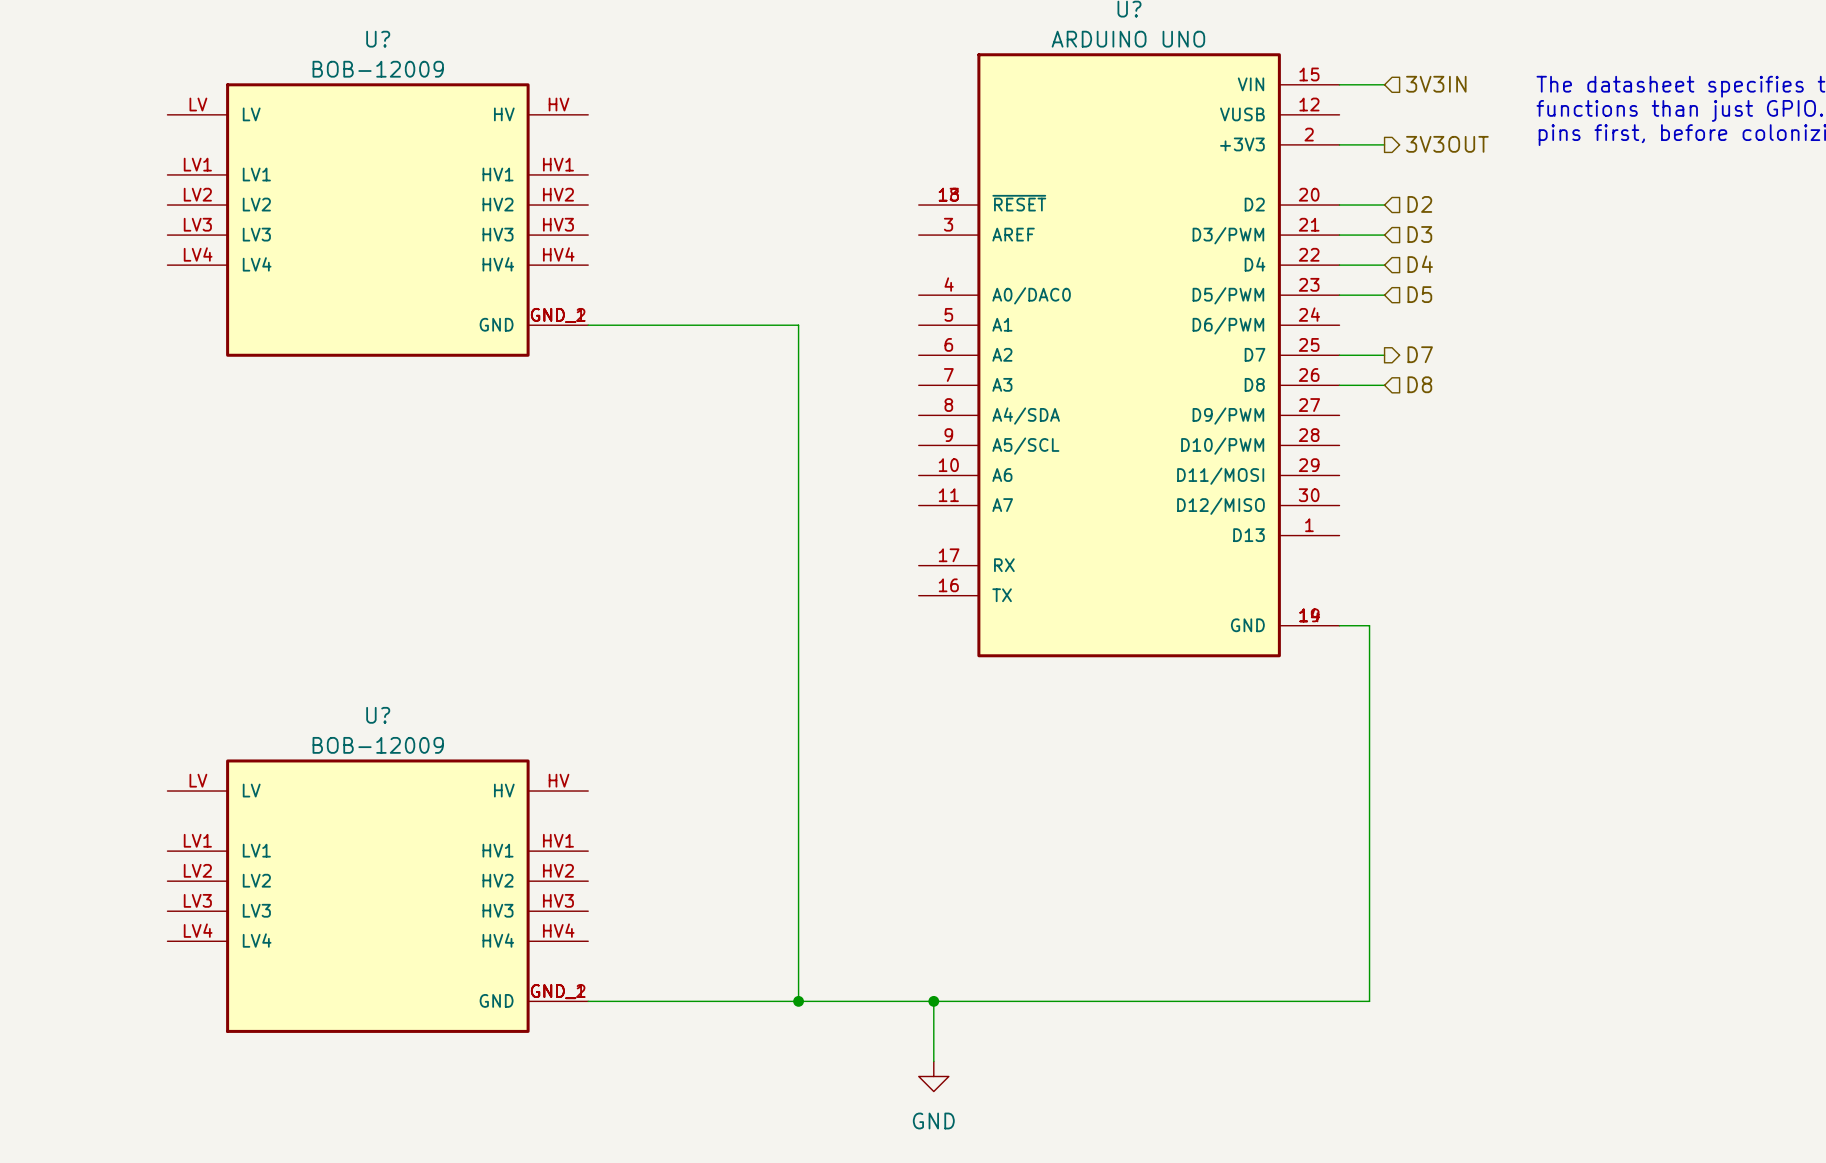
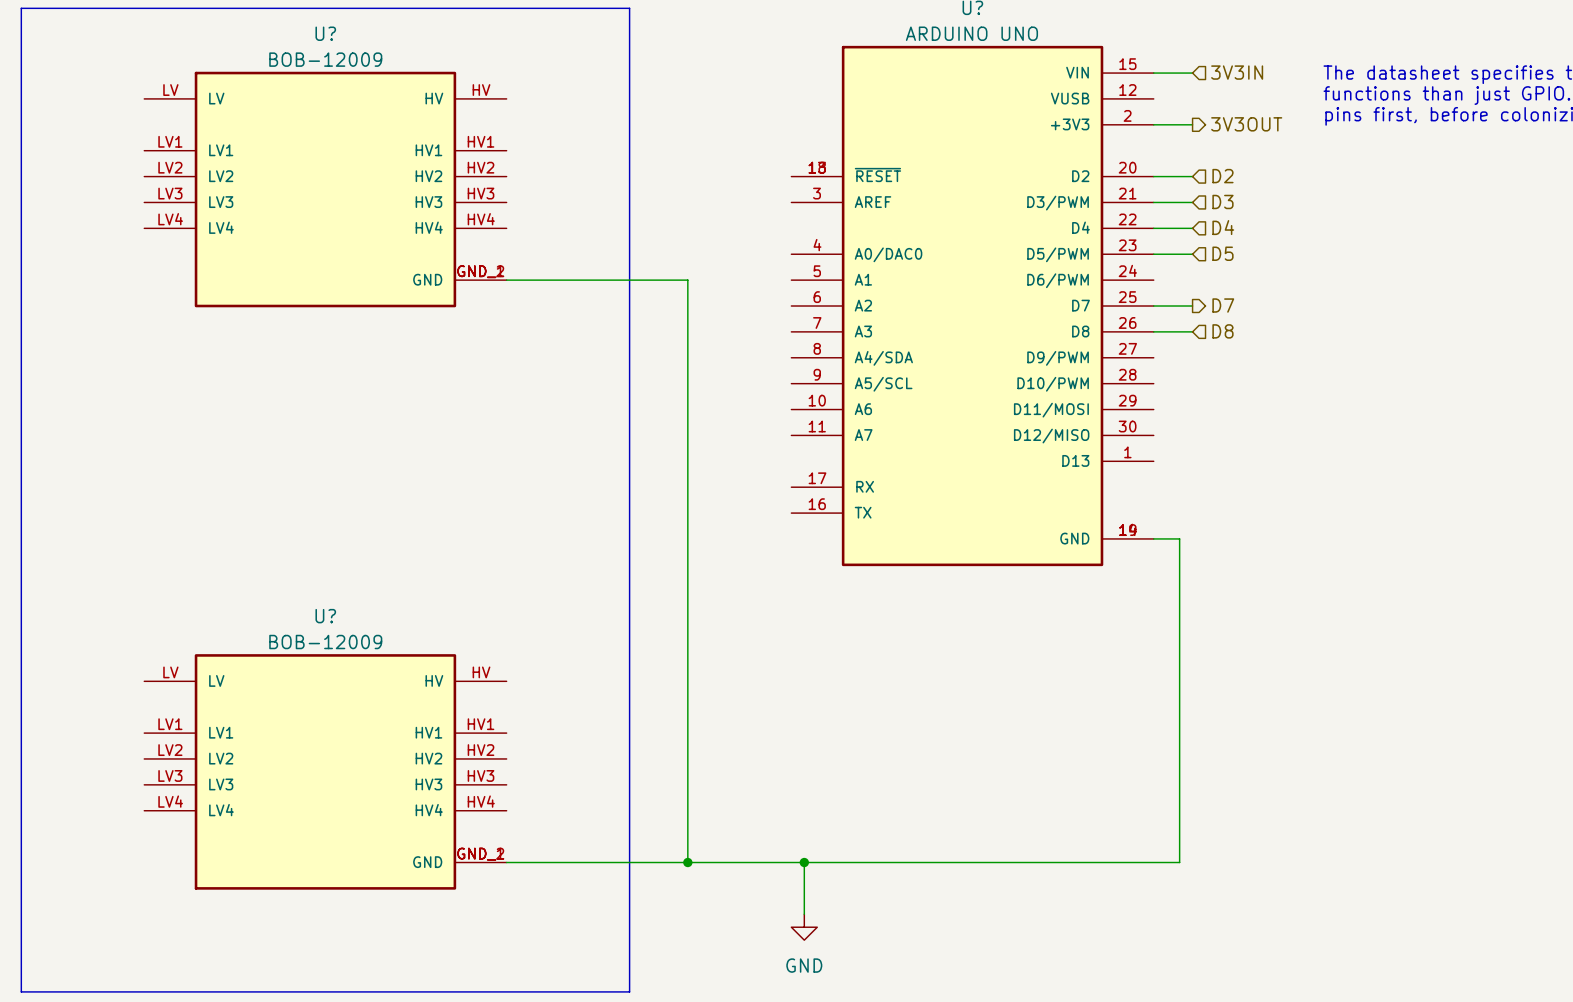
line: none -> (21, 8) (629, 8) (629, 991) (21, 991) (21, 8)

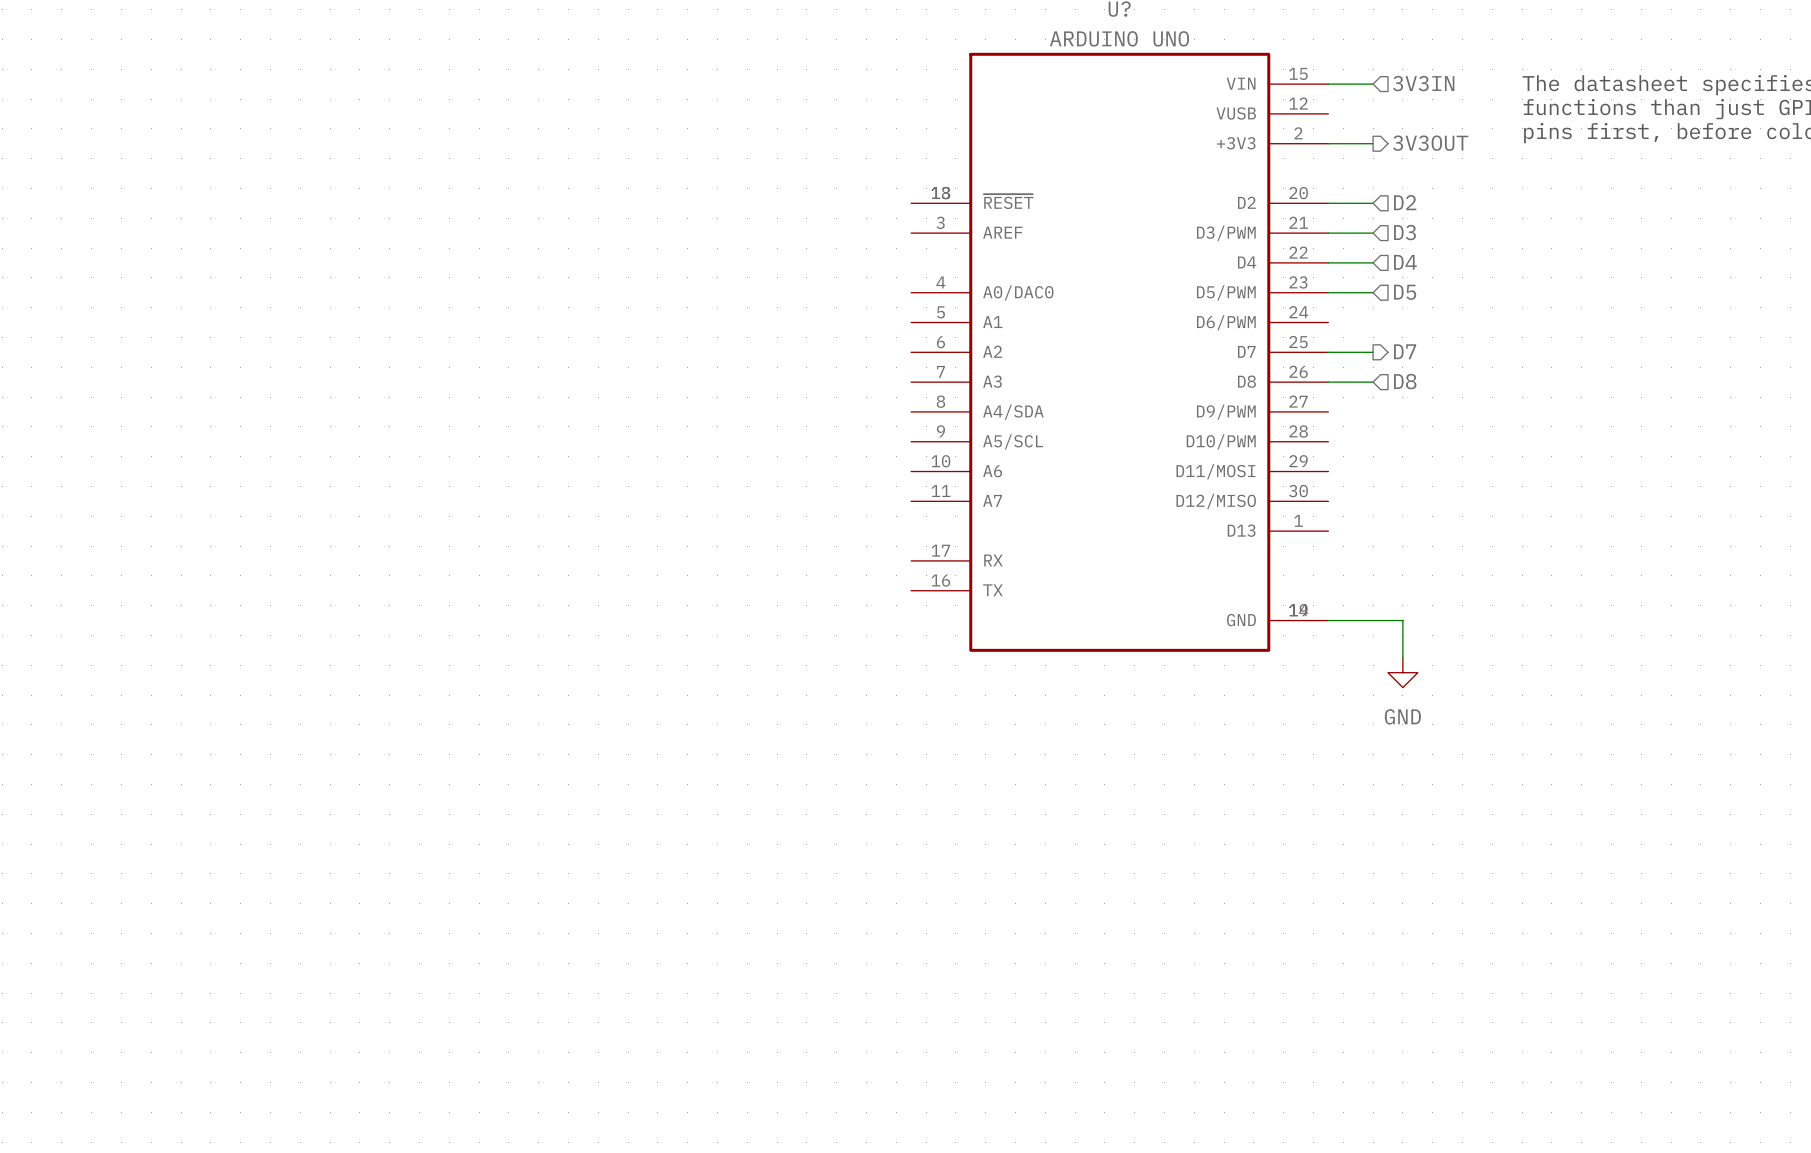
line: (21, 8) (629, 8) (629, 991) (21, 991) (21, 8) -> none
U?: BOB-12009 (325, 189) -> none
wire: (506, 280) (687, 280) (687, 862) -> none
wire: (1179, 538) (1179, 862) (506, 862) -> (1358, 620) (1402, 620) (1402, 657)
power symbol: none -> GND (1402, 672)
U?: BOB-12009 (325, 771) -> none
junction: (687, 862) -> none
wire: (804, 862) (804, 914) -> none
junction: (804, 862) -> none
power symbol: GND (804, 927) -> none

